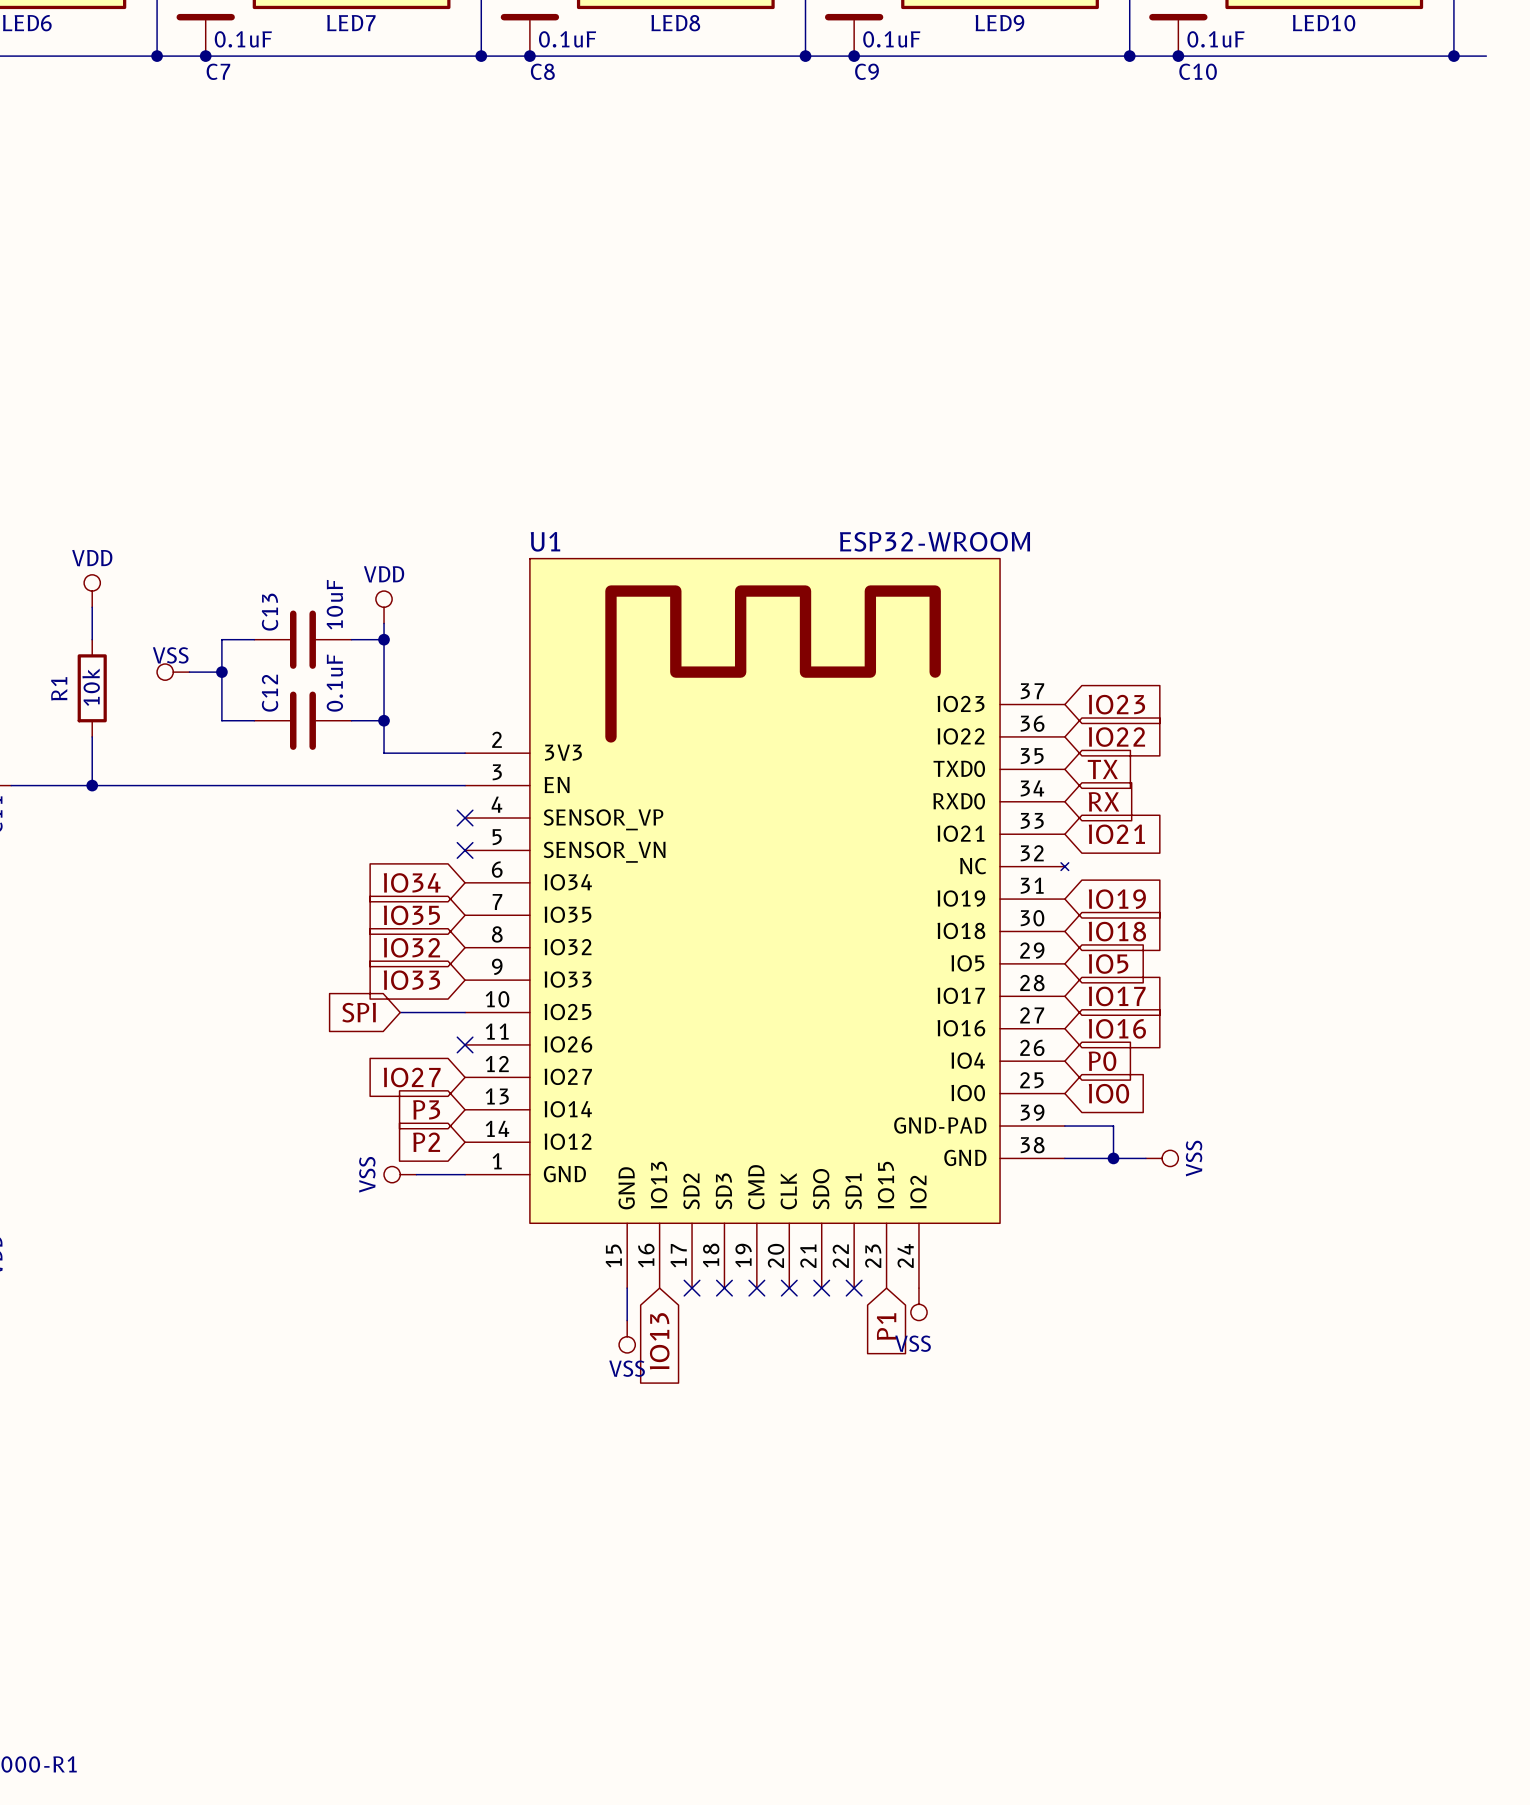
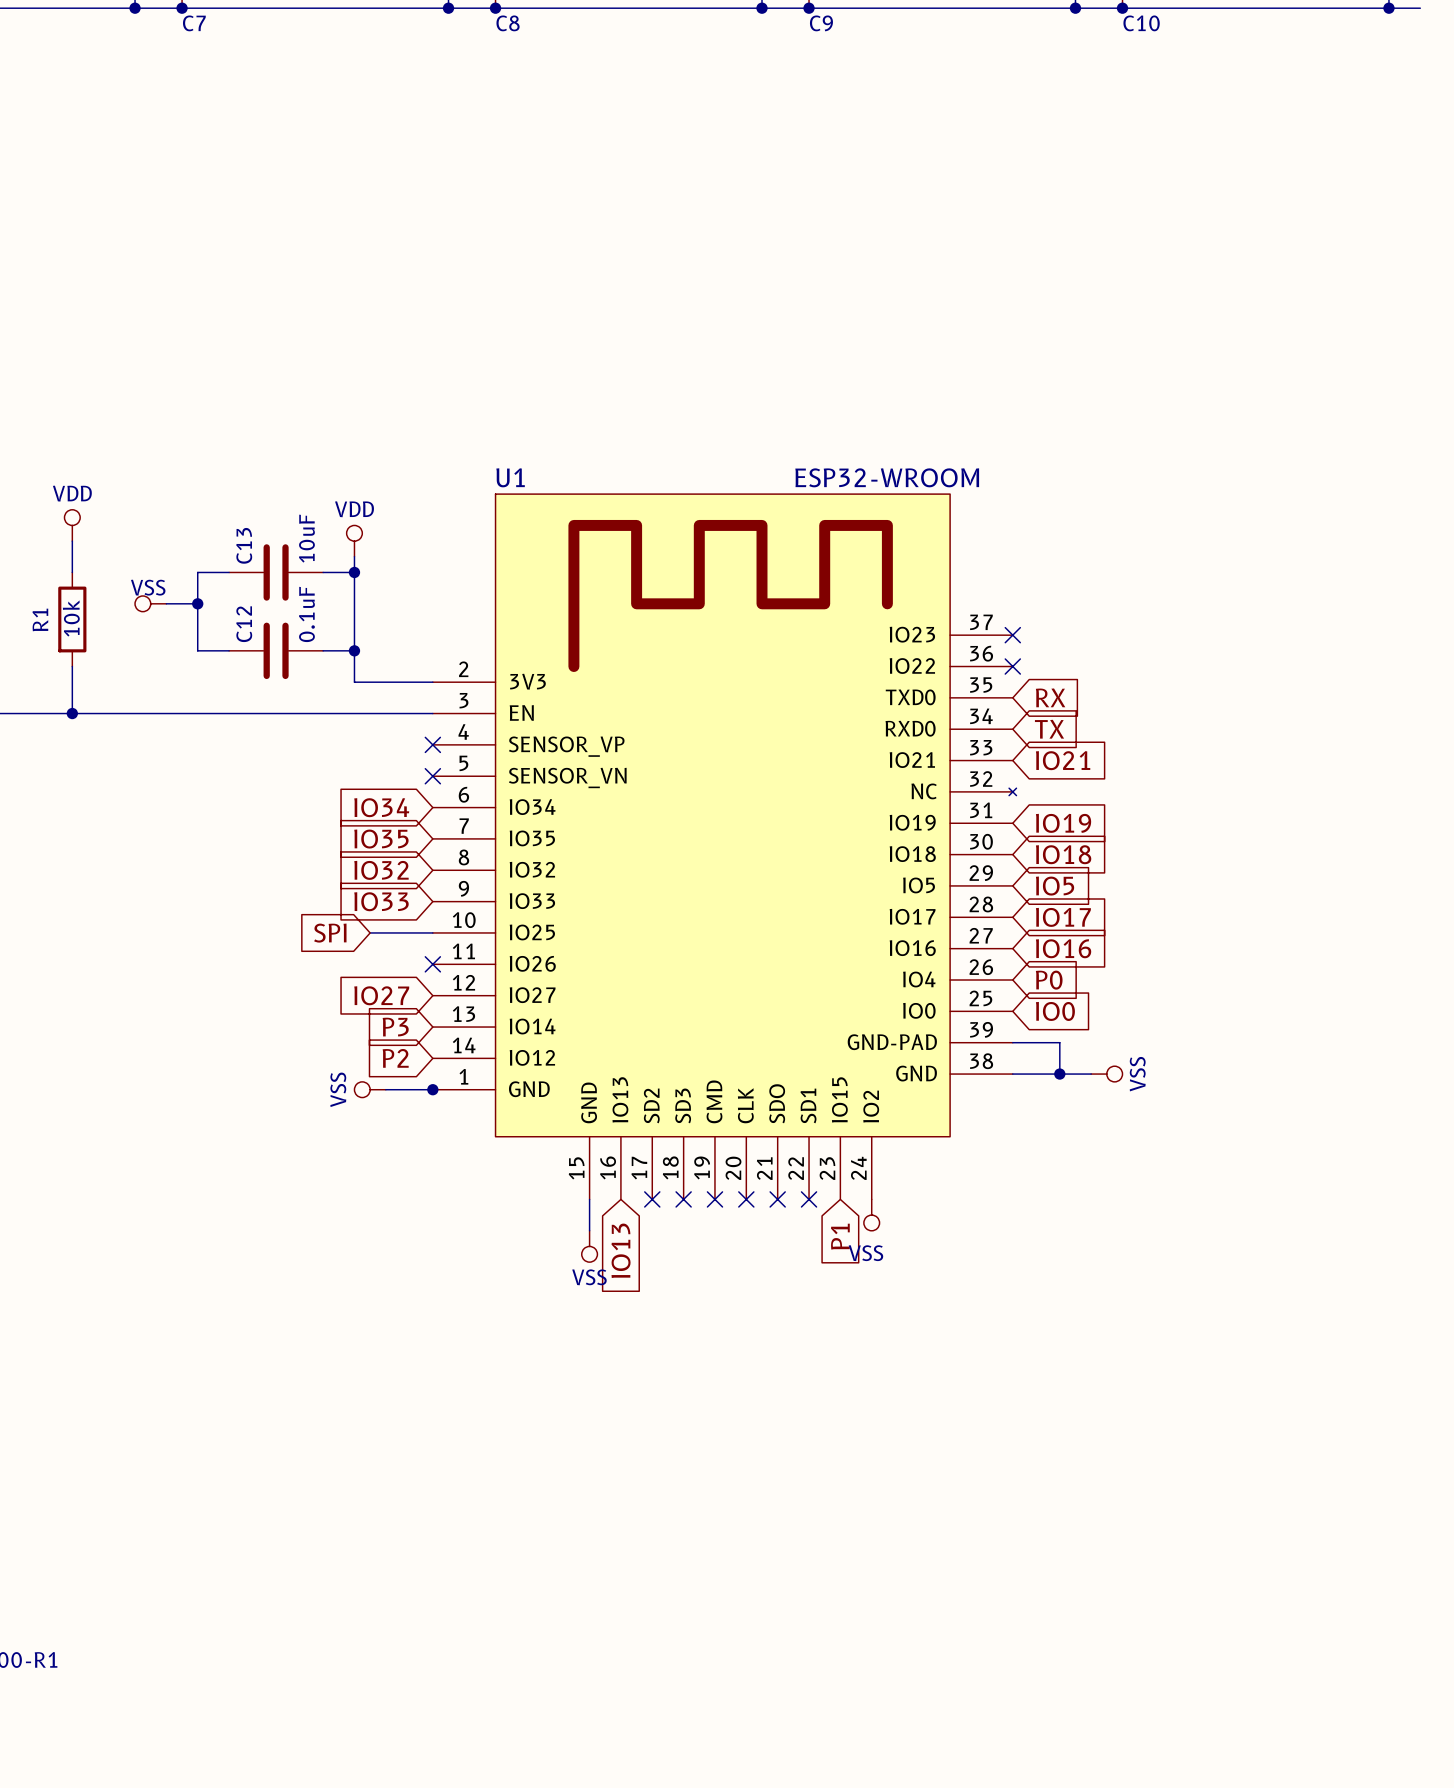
no-connect mark: none -> (1012, 635)
global label: IO23 (1116, 704) -> none
no-connect mark: none -> (1012, 666)
global label: IO22 (1116, 737) -> none
global label: TX (1102, 769) -> RX (1050, 697)
global label: RX (1103, 801) -> TX (1049, 729)
junction: none -> (432, 1089)

